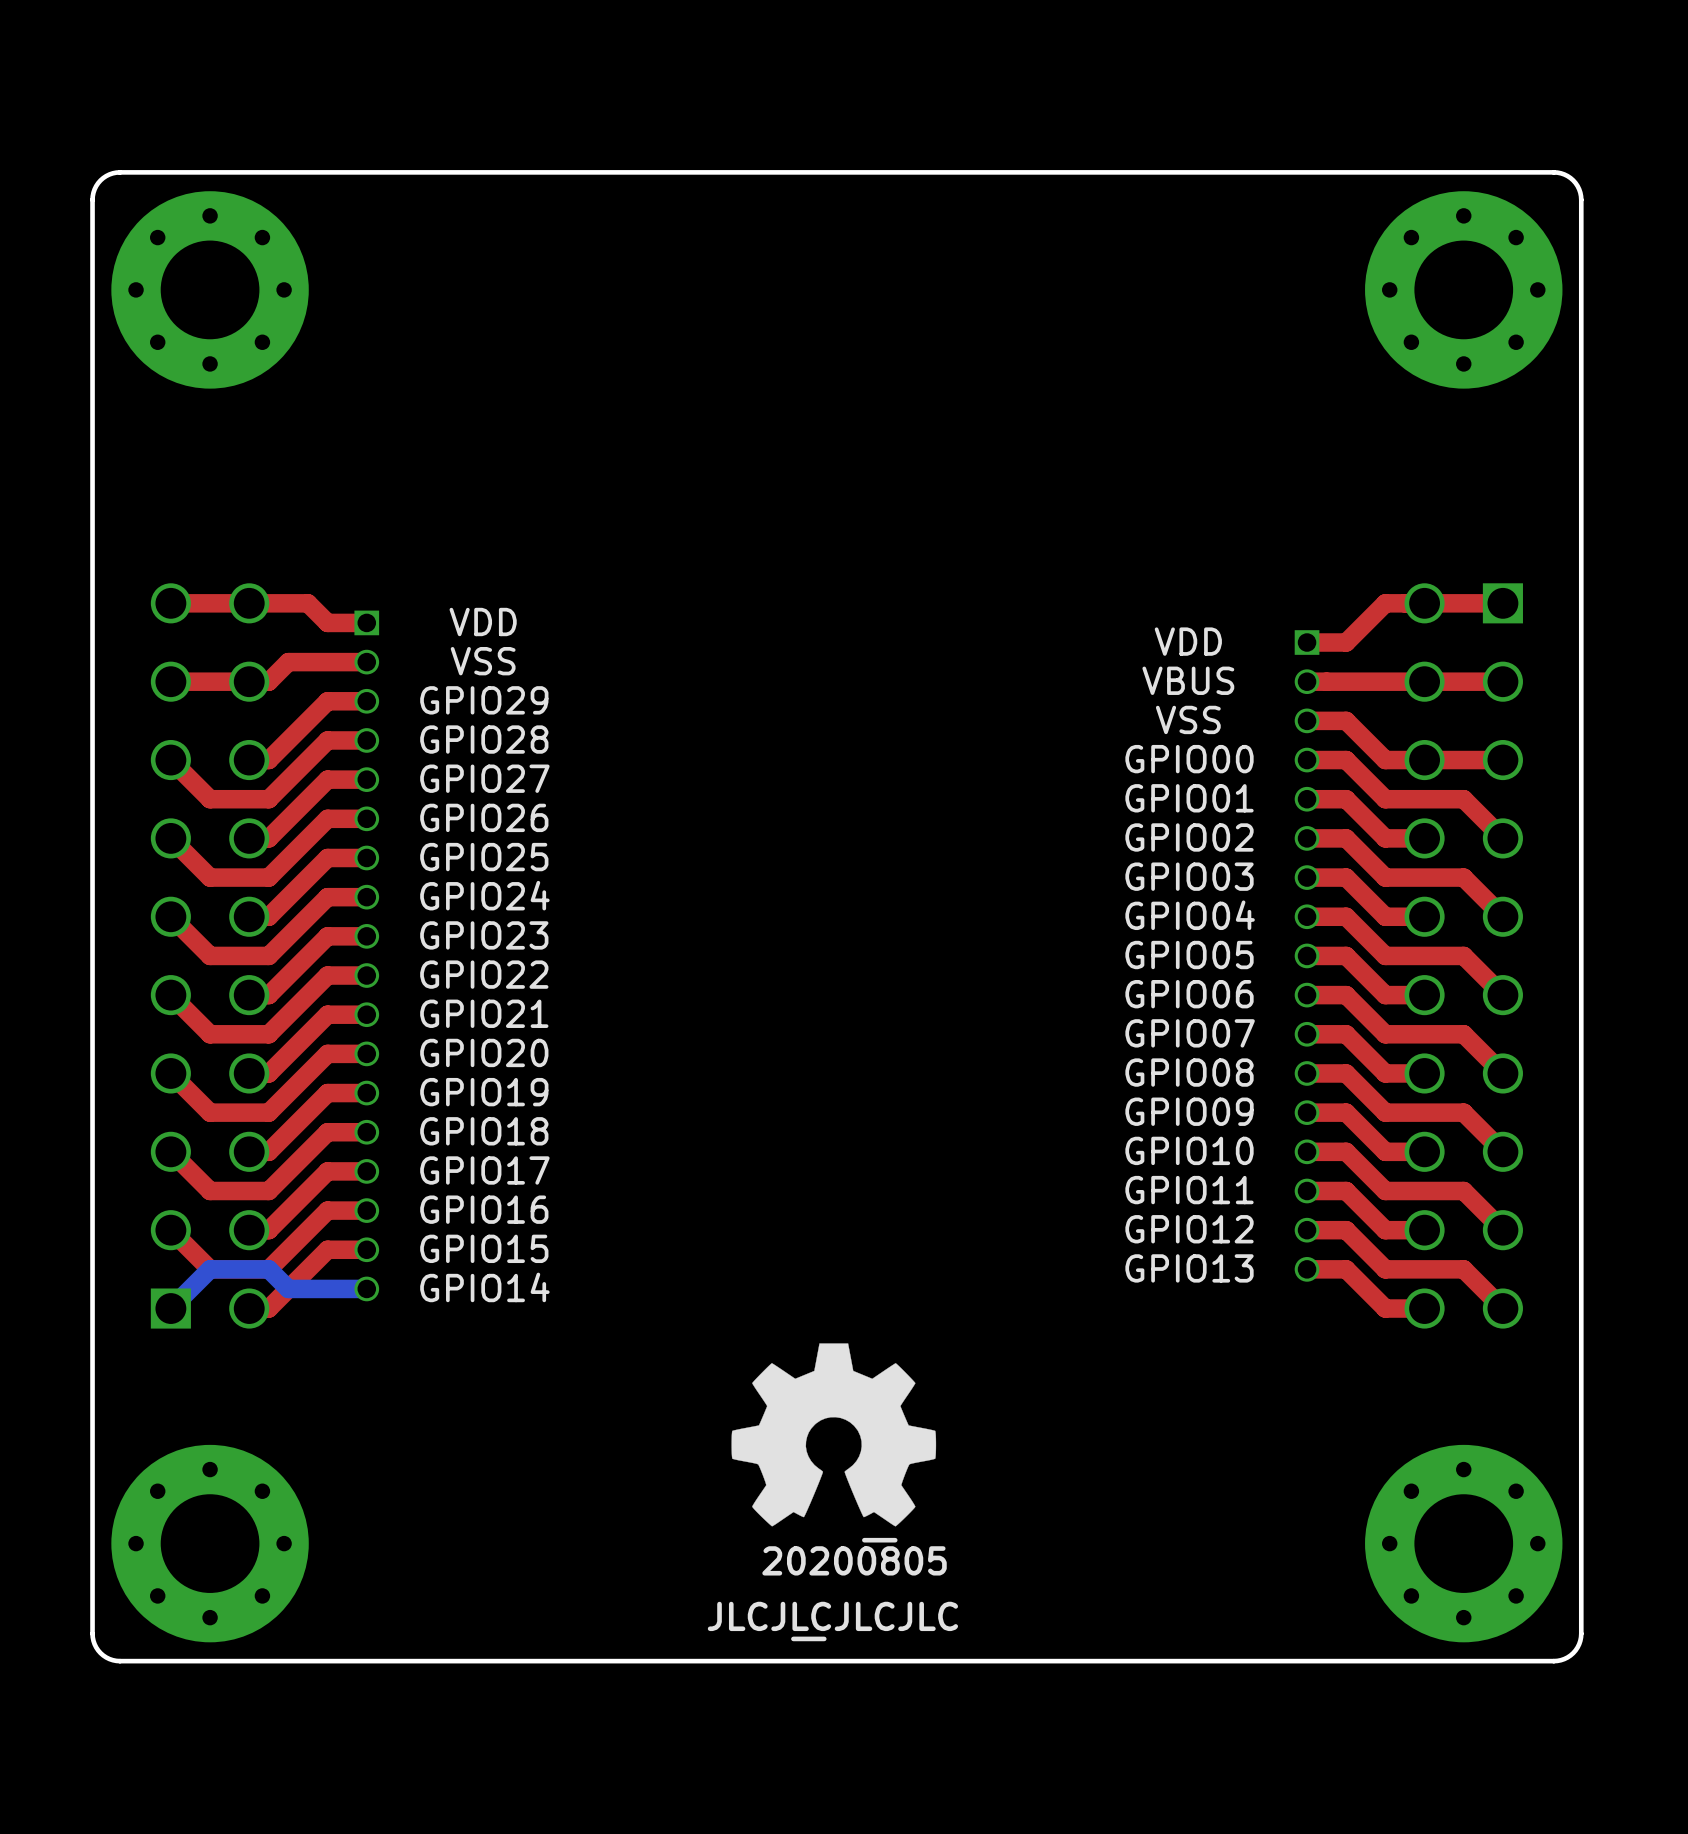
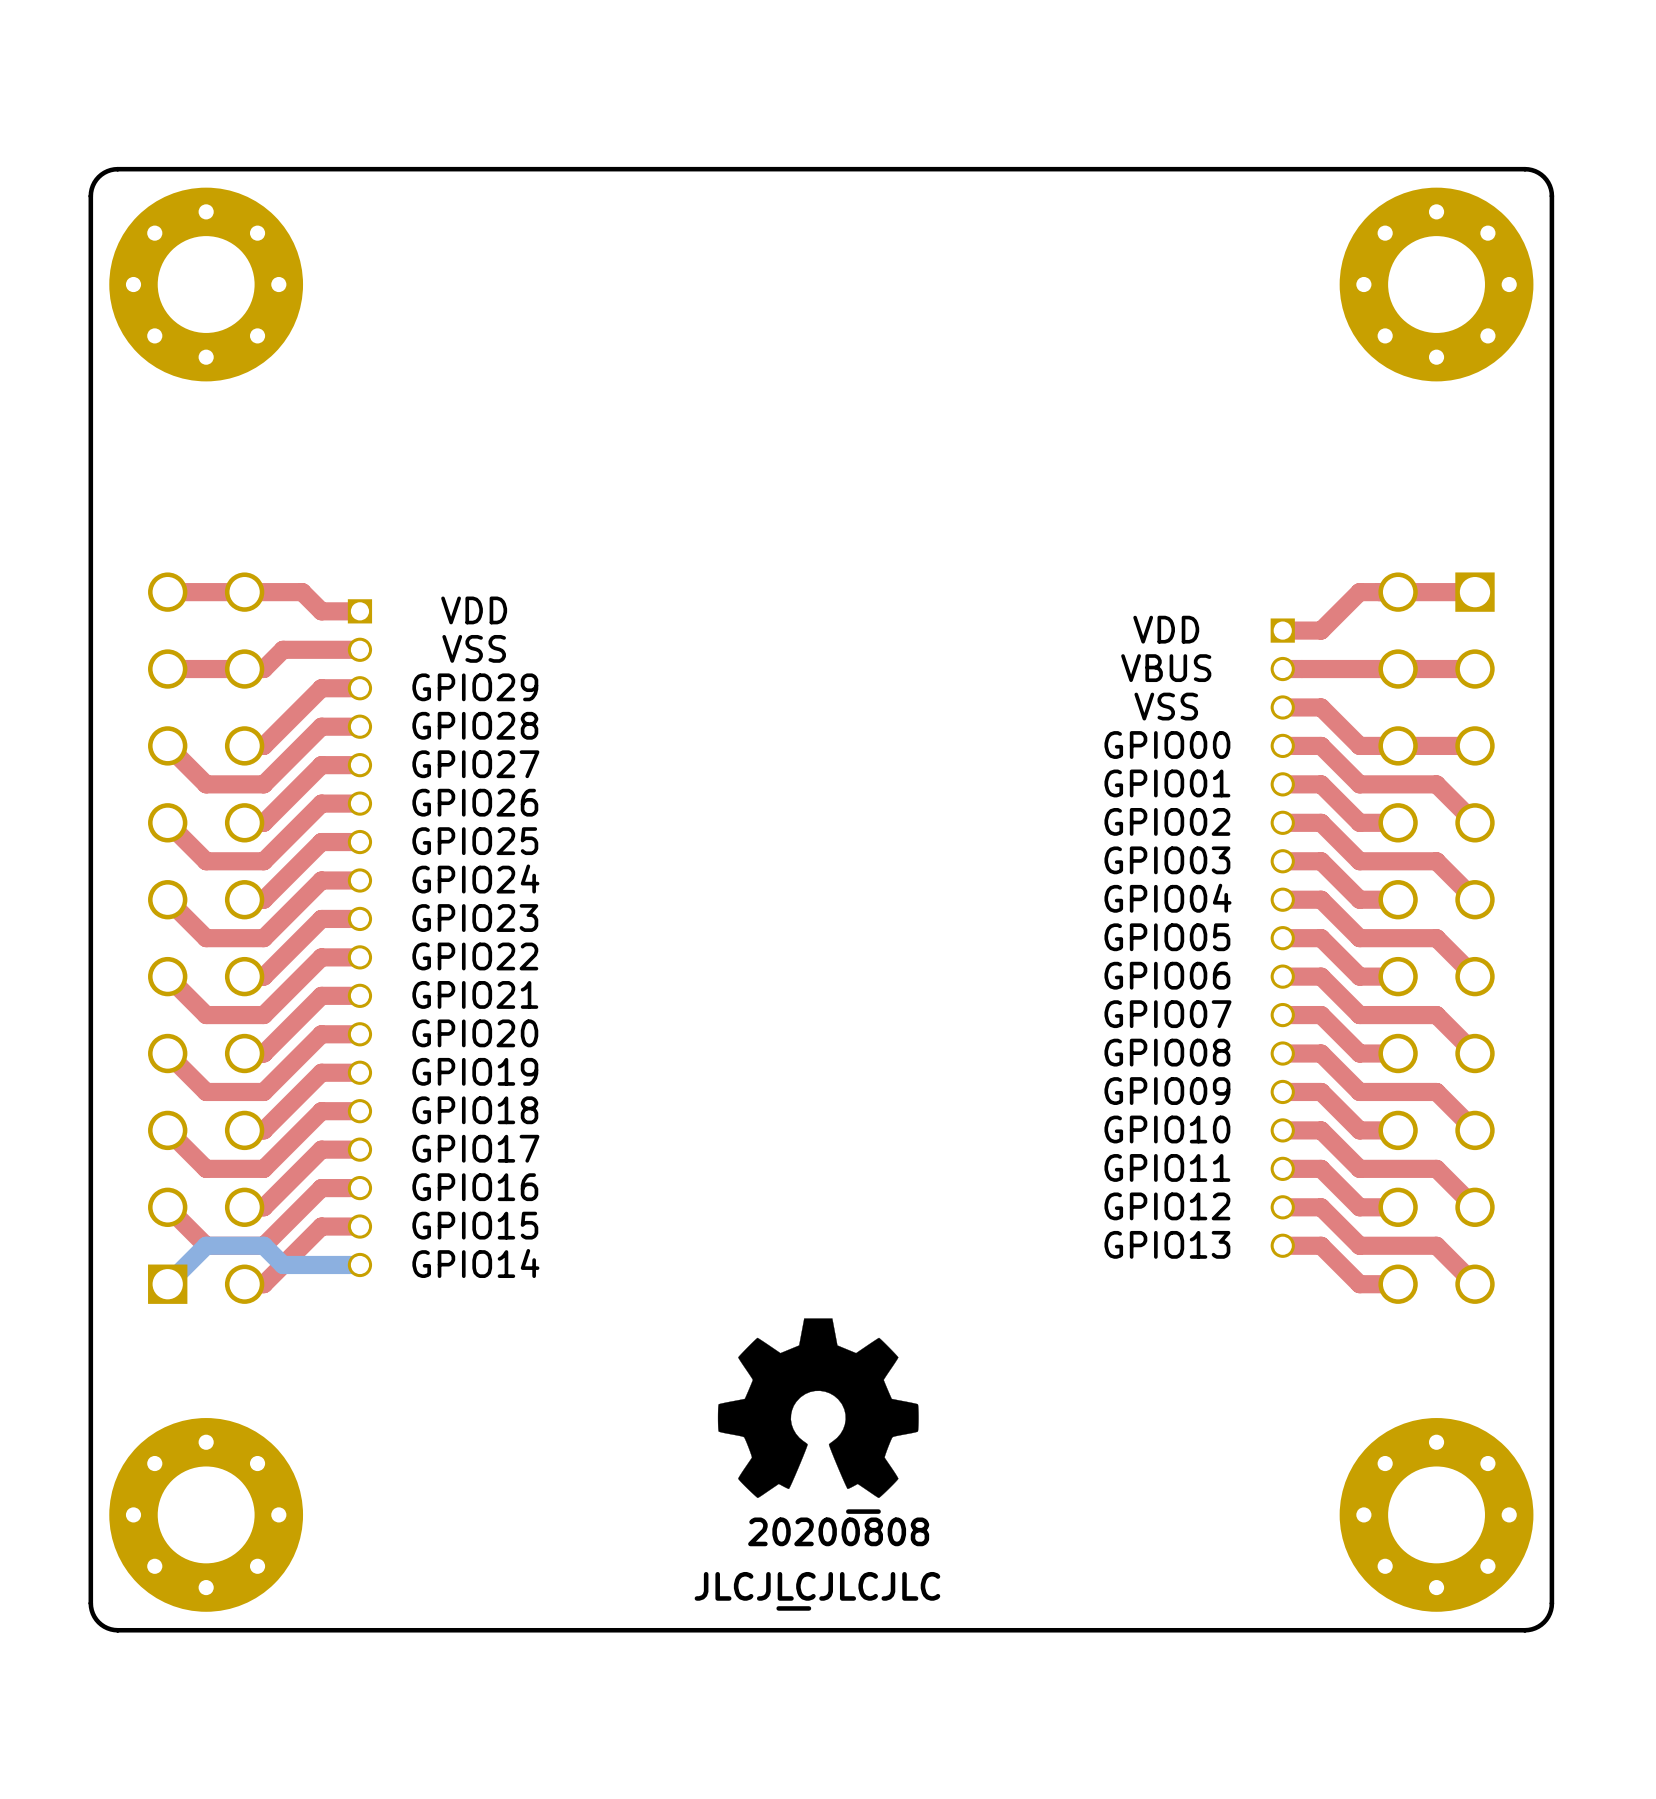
drawing shape: [762, 1537, 947, 1576] -> [748, 1509, 930, 1547]

